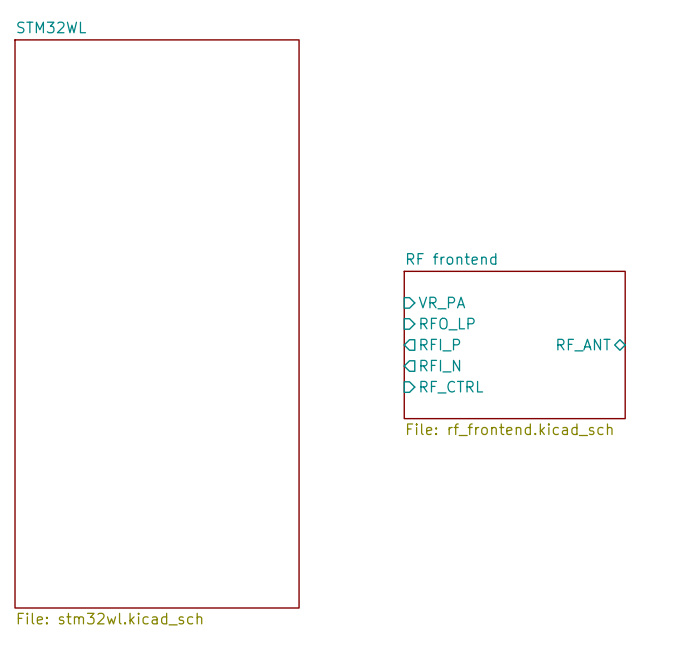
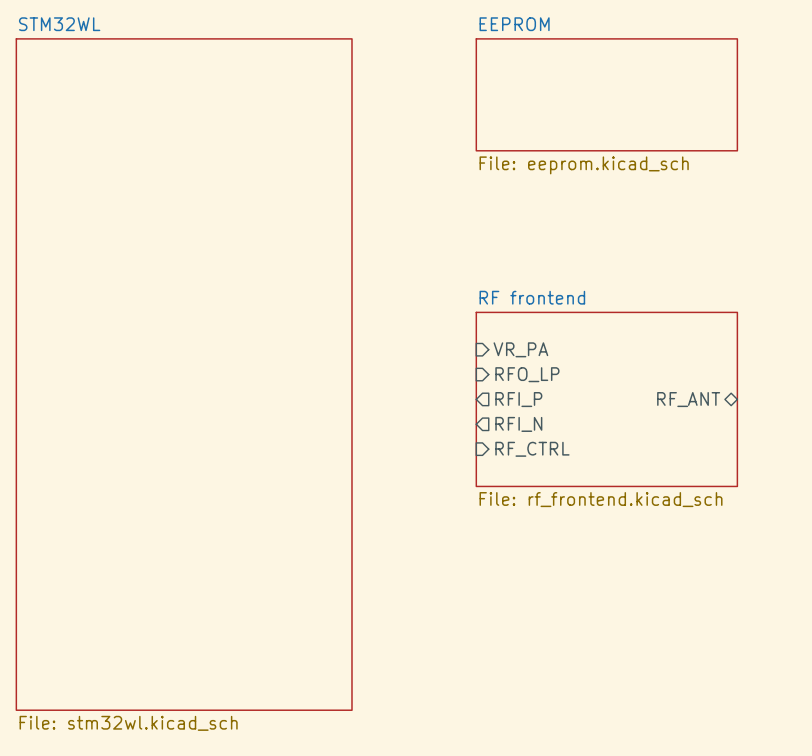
sheet EEPROM: none -> File: eeprom.kicad_sch (606, 94)

